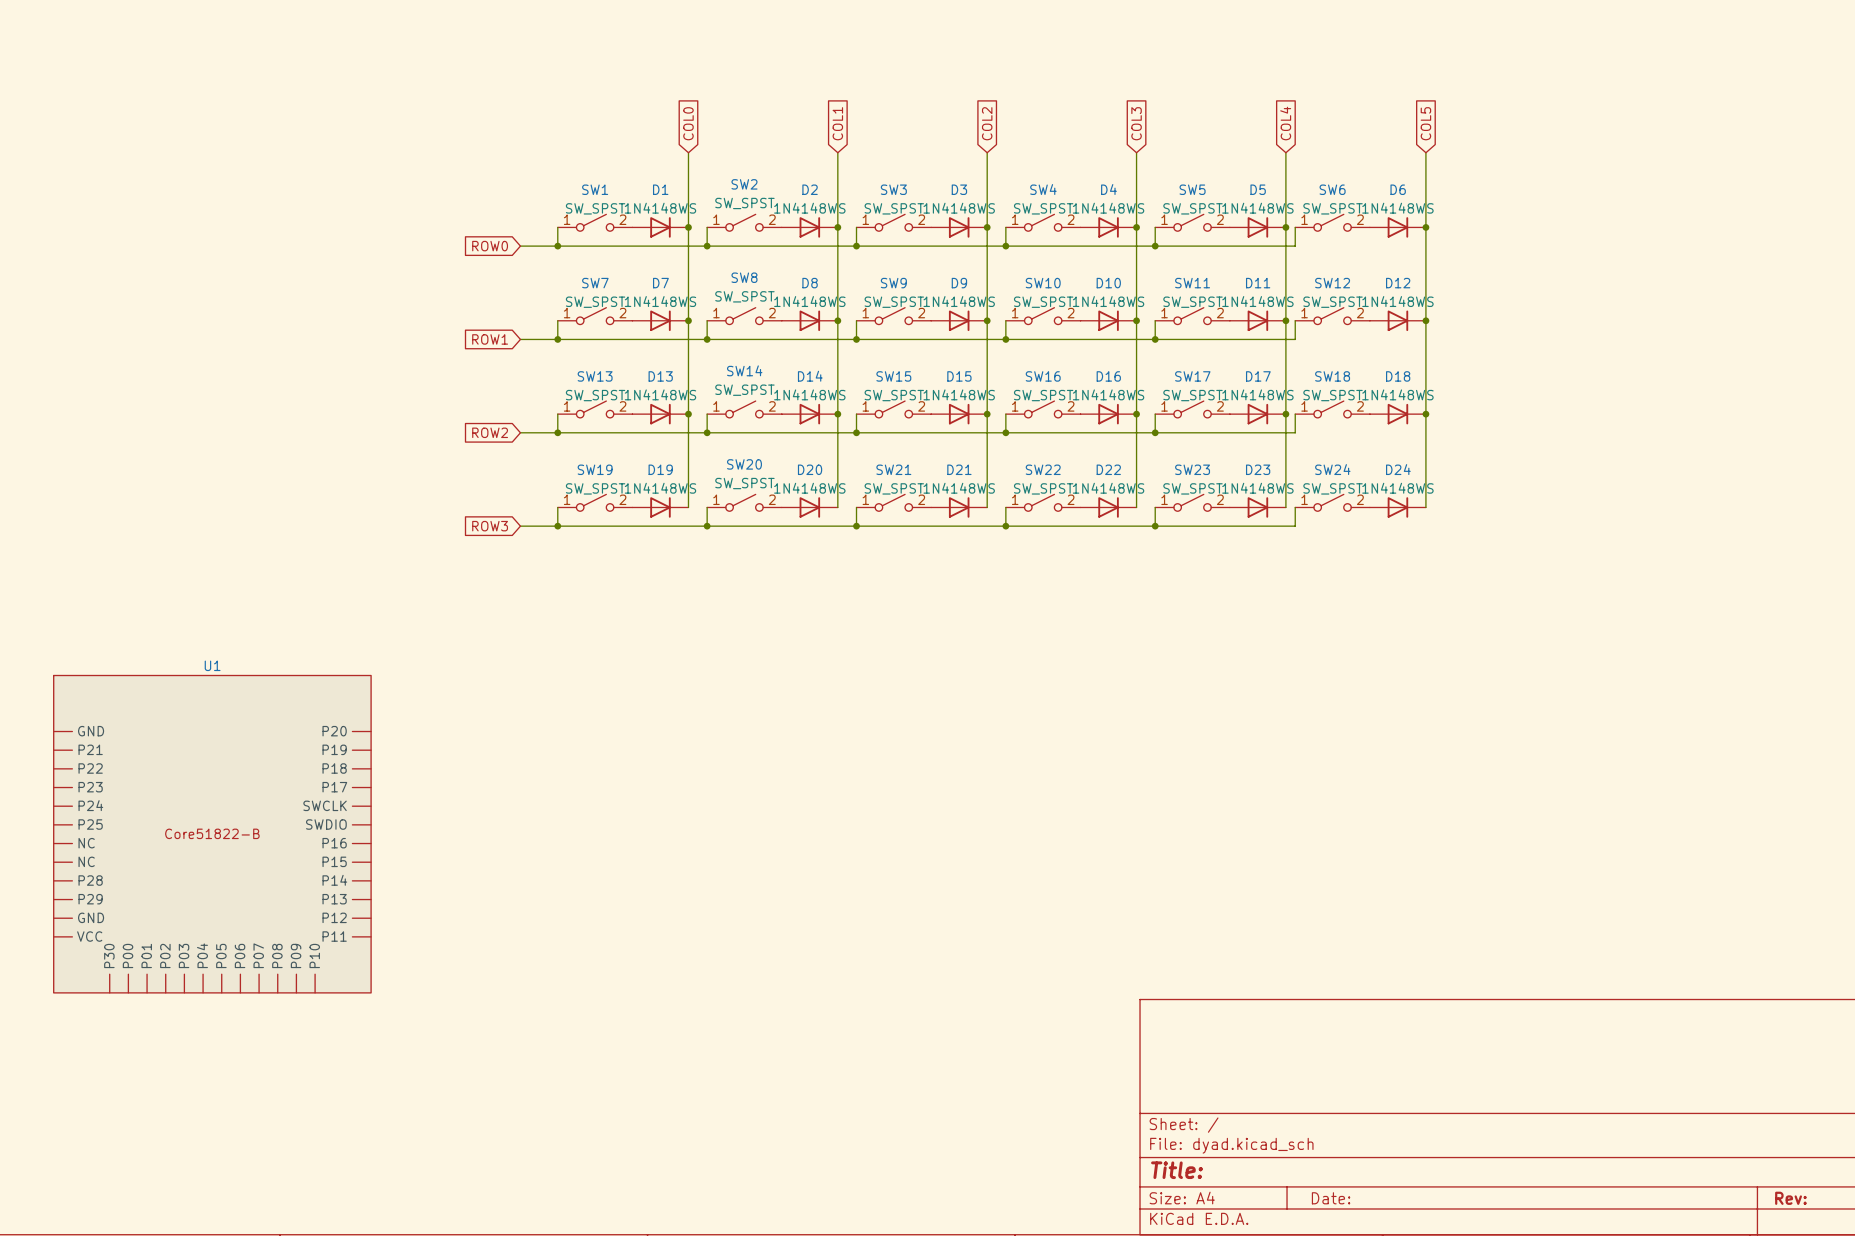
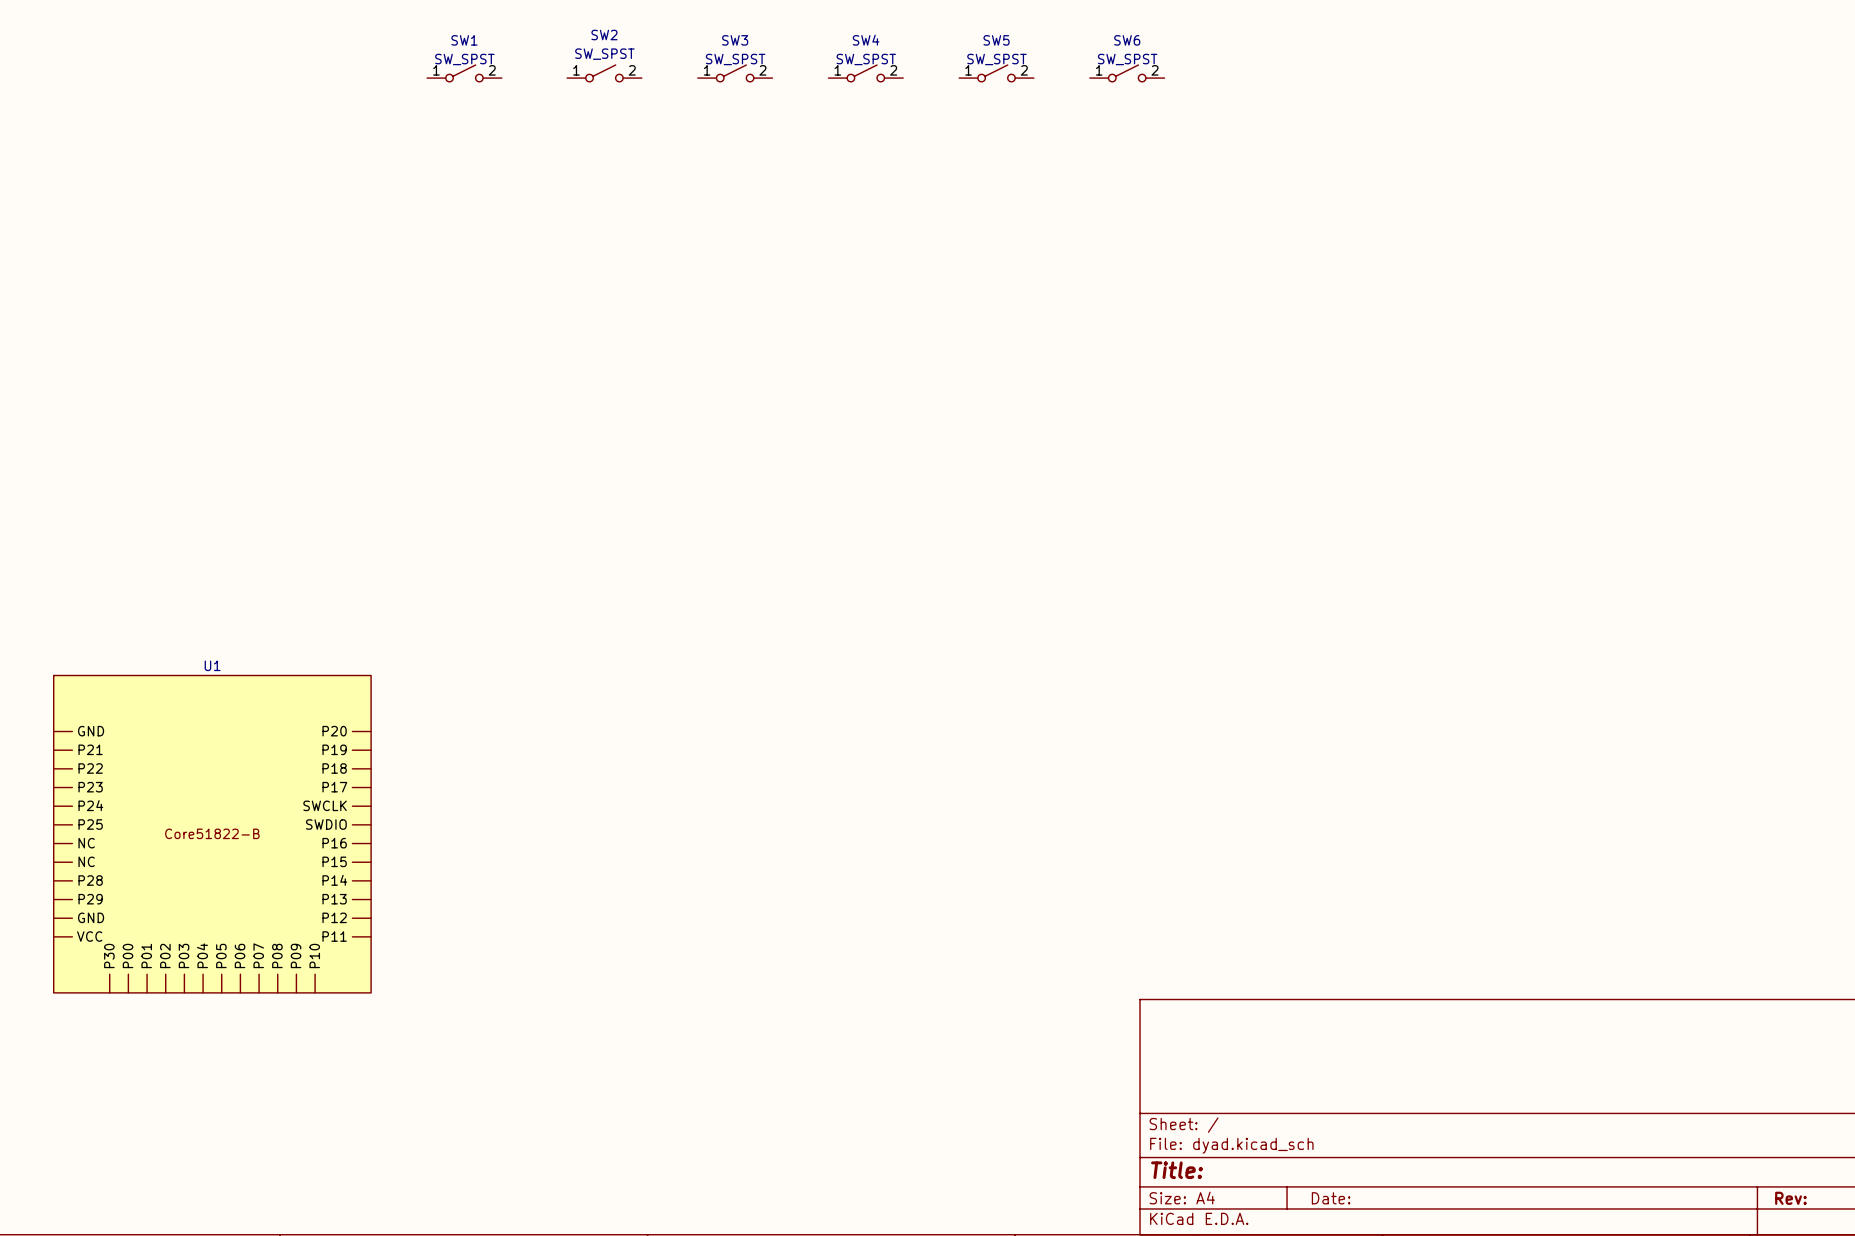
global label: COL0 (688, 123) -> none
global label: COL1 (837, 123) -> none
global label: COL2 (987, 123) -> none
global label: COL3 (1136, 123) -> none
global label: COL4 (1285, 123) -> none
global label: COL5 (1425, 123) -> none
wire: (688, 152) (688, 507) -> none
wire: (837, 152) (837, 507) -> none
wire: (987, 152) (987, 507) -> none
wire: (1136, 152) (1136, 507) -> none
wire: (1285, 152) (1285, 507) -> none
wire: (1425, 152) (1425, 507) -> none
SW1 position: (595, 222) -> (464, 73)
SW2 position: (744, 222) -> (604, 73)
SW3 position: (893, 222) -> (735, 73)
SW4 position: (1043, 222) -> (865, 73)
SW5 position: (1192, 222) -> (996, 73)
SW6 position: (1332, 222) -> (1127, 73)
wire: (557, 227) (557, 246) -> none
D1: 1N4148WS (660, 227) -> none
junction: (688, 227) -> none
wire: (707, 227) (707, 246) -> none
D2: 1N4148WS (809, 227) -> none
junction: (837, 227) -> none
wire: (856, 227) (856, 246) -> none
D3: 1N4148WS (959, 227) -> none
junction: (987, 227) -> none
wire: (1005, 227) (1005, 246) -> none
D4: 1N4148WS (1108, 227) -> none
junction: (1136, 227) -> none
wire: (1155, 227) (1155, 246) -> none
D5: 1N4148WS (1257, 227) -> none
junction: (1285, 227) -> none
wire: (1295, 227) (1295, 246) (520, 246) -> none
D6: 1N4148WS (1397, 227) -> none
junction: (1425, 227) -> none
global label: ROW0 (490, 246) -> none
junction: (557, 246) -> none
junction: (707, 246) -> none
junction: (856, 246) -> none
junction: (1005, 246) -> none
junction: (1155, 246) -> none
SW7: SW_SPST (595, 316) -> none
SW8: SW_SPST (744, 316) -> none
SW9: SW_SPST (893, 316) -> none
SW10: SW_SPST (1043, 316) -> none
SW11: SW_SPST (1192, 316) -> none
SW12: SW_SPST (1332, 316) -> none
wire: (557, 320) (557, 339) -> none
D7: 1N4148WS (660, 320) -> none
junction: (688, 320) -> none
wire: (707, 320) (707, 339) -> none
D8: 1N4148WS (809, 320) -> none
junction: (837, 320) -> none
wire: (856, 320) (856, 339) -> none
D9: 1N4148WS (959, 320) -> none
junction: (987, 320) -> none
wire: (1005, 320) (1005, 339) -> none
D10: 1N4148WS (1108, 320) -> none
junction: (1136, 320) -> none
wire: (1155, 320) (1155, 339) -> none
D11: 1N4148WS (1257, 320) -> none
junction: (1285, 320) -> none
wire: (1295, 320) (1295, 339) (520, 339) -> none
D12: 1N4148WS (1397, 320) -> none
junction: (1425, 320) -> none
global label: ROW1 (490, 339) -> none
junction: (557, 339) -> none
junction: (707, 339) -> none
junction: (856, 339) -> none
junction: (1005, 339) -> none
junction: (1155, 339) -> none
SW13: SW_SPST (595, 409) -> none
SW14: SW_SPST (744, 409) -> none
SW15: SW_SPST (893, 409) -> none
SW16: SW_SPST (1043, 409) -> none
SW17: SW_SPST (1192, 409) -> none
SW18: SW_SPST (1332, 409) -> none
wire: (557, 414) (557, 432) -> none
D13: 1N4148WS (660, 414) -> none
junction: (688, 414) -> none
wire: (707, 414) (707, 432) -> none
D14: 1N4148WS (809, 414) -> none
junction: (837, 414) -> none
wire: (856, 414) (856, 432) -> none
D15: 1N4148WS (959, 414) -> none
junction: (987, 414) -> none
wire: (1005, 414) (1005, 432) -> none
D16: 1N4148WS (1108, 414) -> none
junction: (1136, 414) -> none
wire: (1155, 414) (1155, 432) -> none
D17: 1N4148WS (1257, 414) -> none
junction: (1285, 414) -> none
wire: (1295, 414) (1295, 432) (520, 432) -> none
D18: 1N4148WS (1397, 414) -> none
junction: (1425, 414) -> none
global label: ROW2 (490, 432) -> none
junction: (557, 432) -> none
junction: (707, 432) -> none
junction: (856, 432) -> none
junction: (1005, 432) -> none
junction: (1155, 432) -> none
SW19: SW_SPST (595, 502) -> none
SW20: SW_SPST (744, 502) -> none
SW21: SW_SPST (893, 502) -> none
SW22: SW_SPST (1043, 502) -> none
SW23: SW_SPST (1192, 502) -> none
SW24: SW_SPST (1332, 502) -> none
wire: (557, 507) (557, 526) -> none
D19: 1N4148WS (660, 507) -> none
wire: (707, 507) (707, 526) -> none
D20: 1N4148WS (809, 507) -> none
wire: (856, 507) (856, 526) -> none
D21: 1N4148WS (959, 507) -> none
wire: (1005, 507) (1005, 526) -> none
D22: 1N4148WS (1108, 507) -> none
wire: (1155, 507) (1155, 526) -> none
D23: 1N4148WS (1257, 507) -> none
wire: (1295, 507) (1295, 526) (520, 526) -> none
D24: 1N4148WS (1397, 507) -> none
global label: ROW3 (490, 526) -> none
junction: (557, 526) -> none
junction: (707, 526) -> none
junction: (856, 526) -> none
junction: (1005, 526) -> none
junction: (1155, 526) -> none

